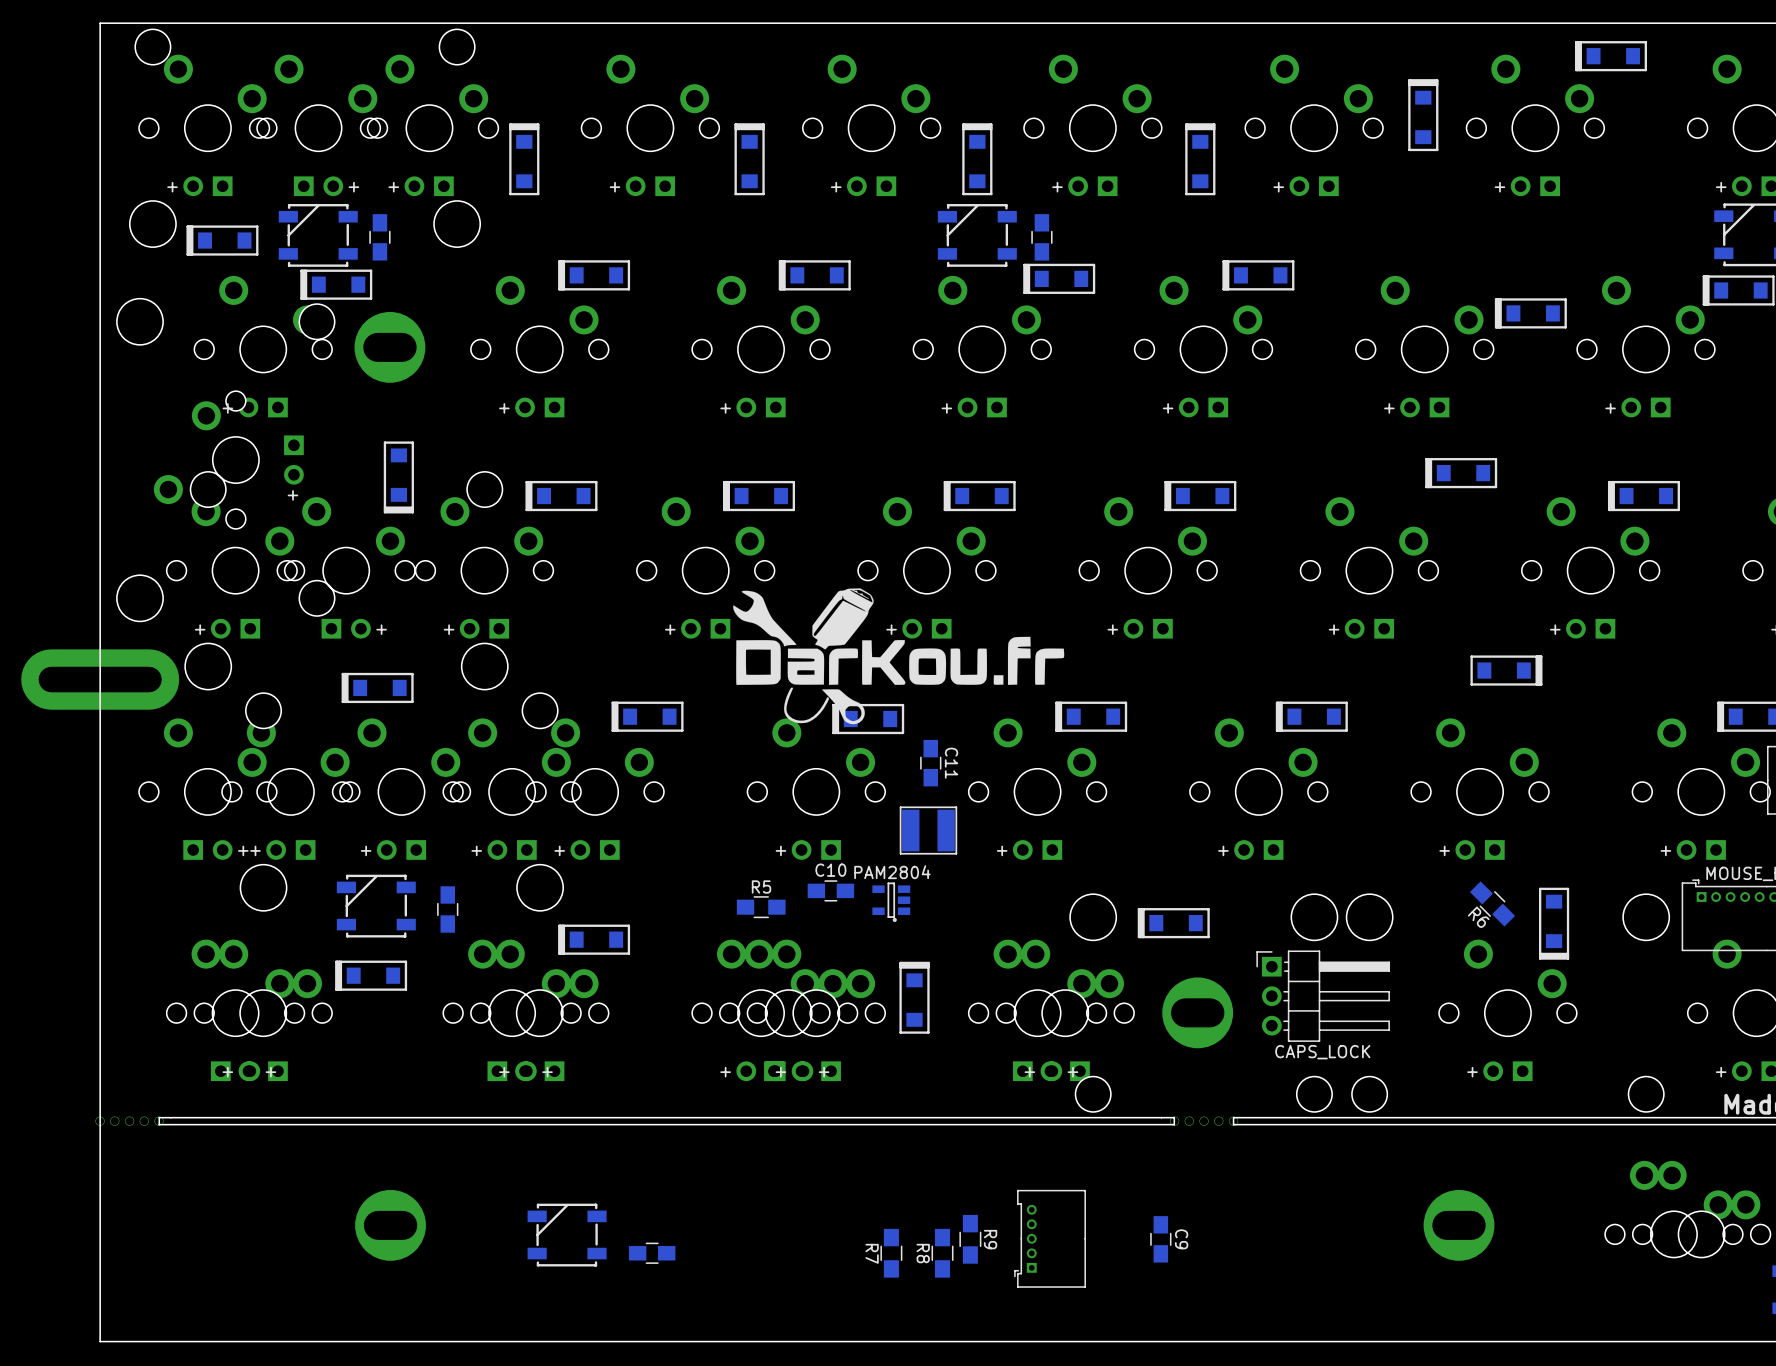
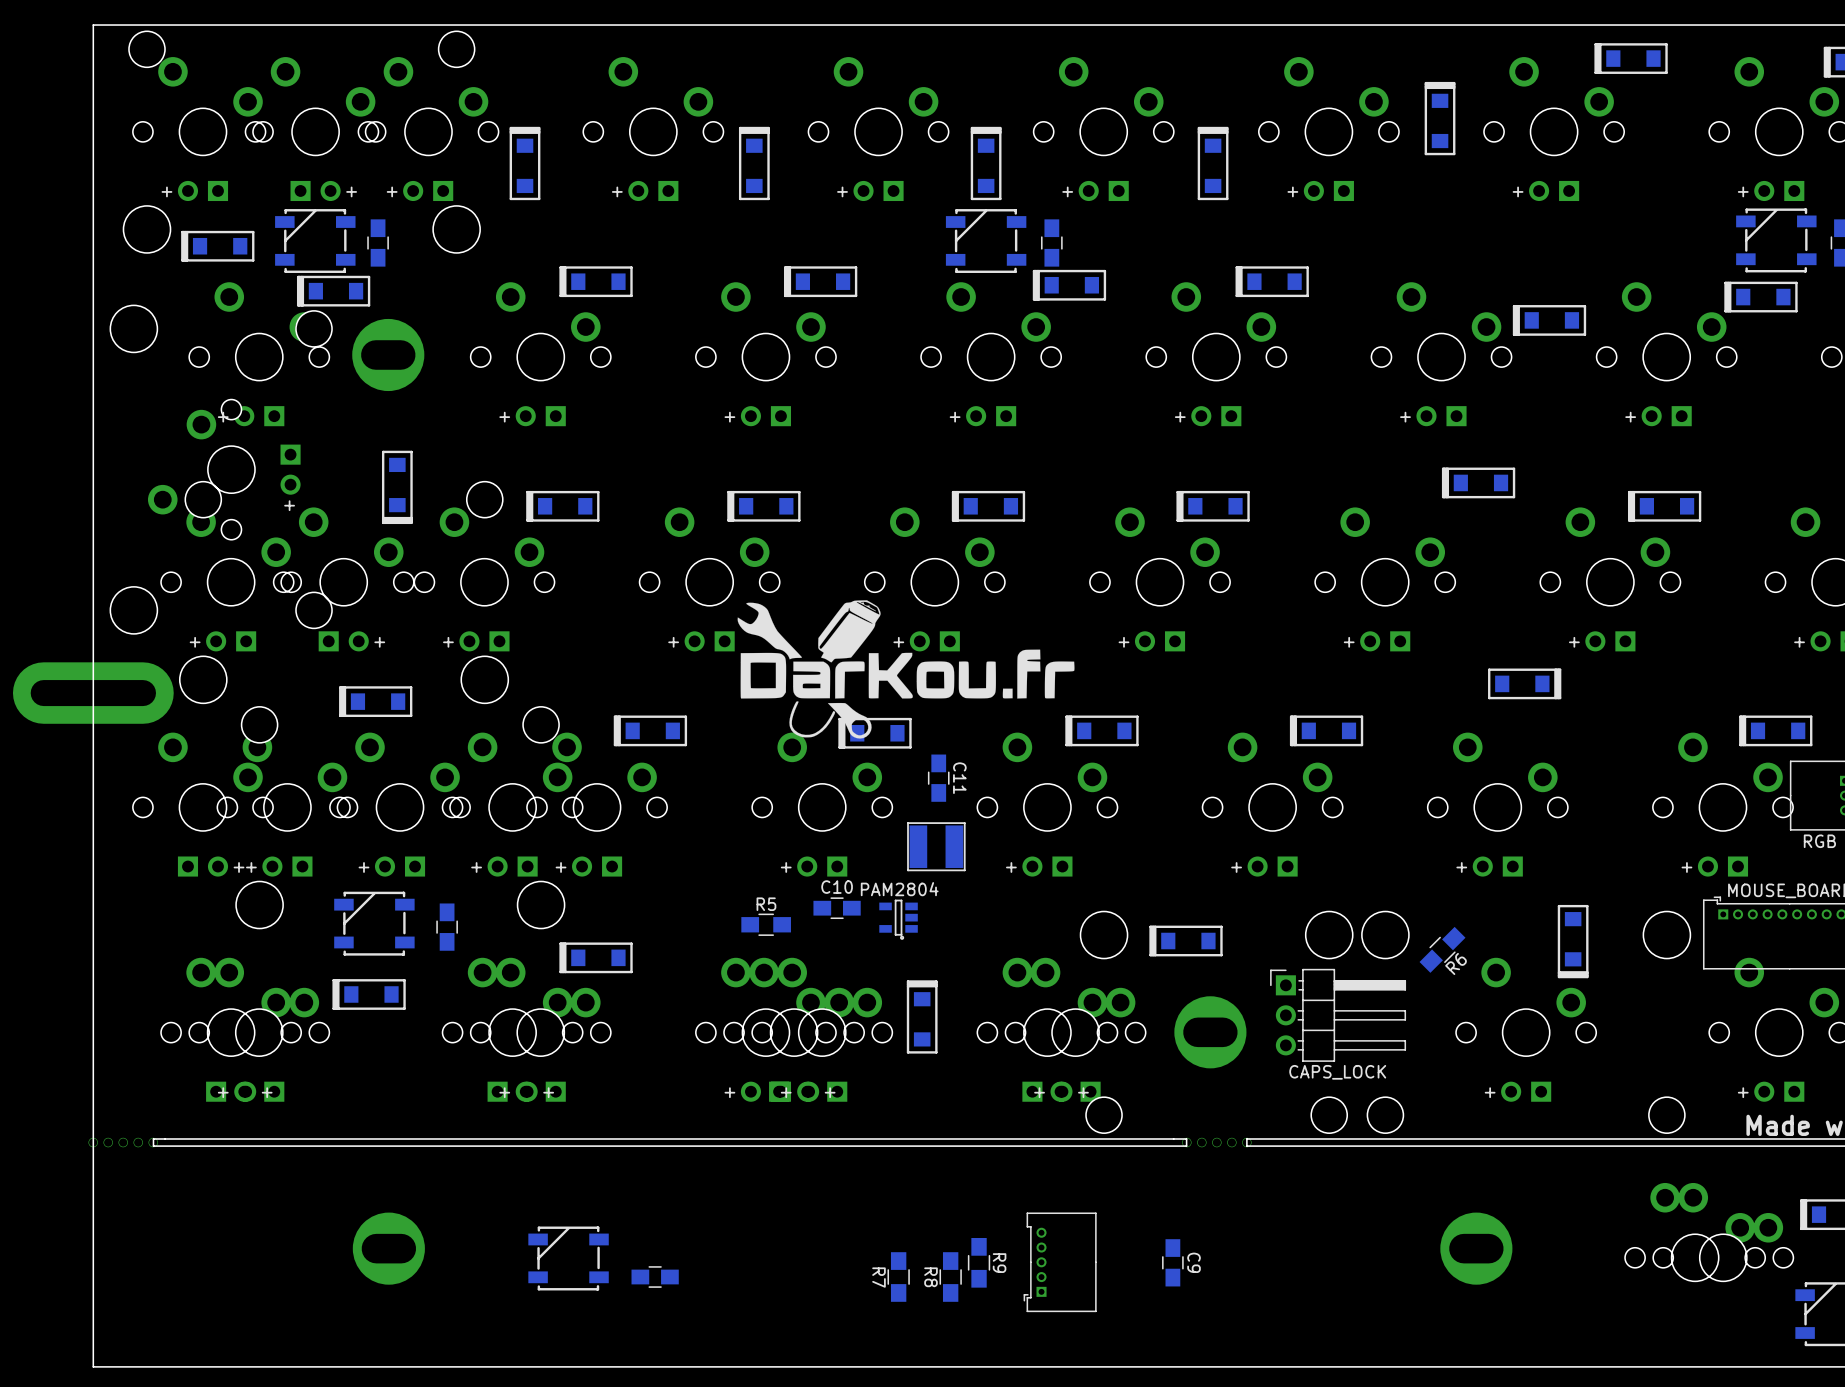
R6 rotation: 0° (1492, 903) -> 90° clockwise (1442, 949)
R6 position: (1492, 903) -> (1442, 949)
R6 name position: R6 (1478, 917) -> R6 (1456, 963)

